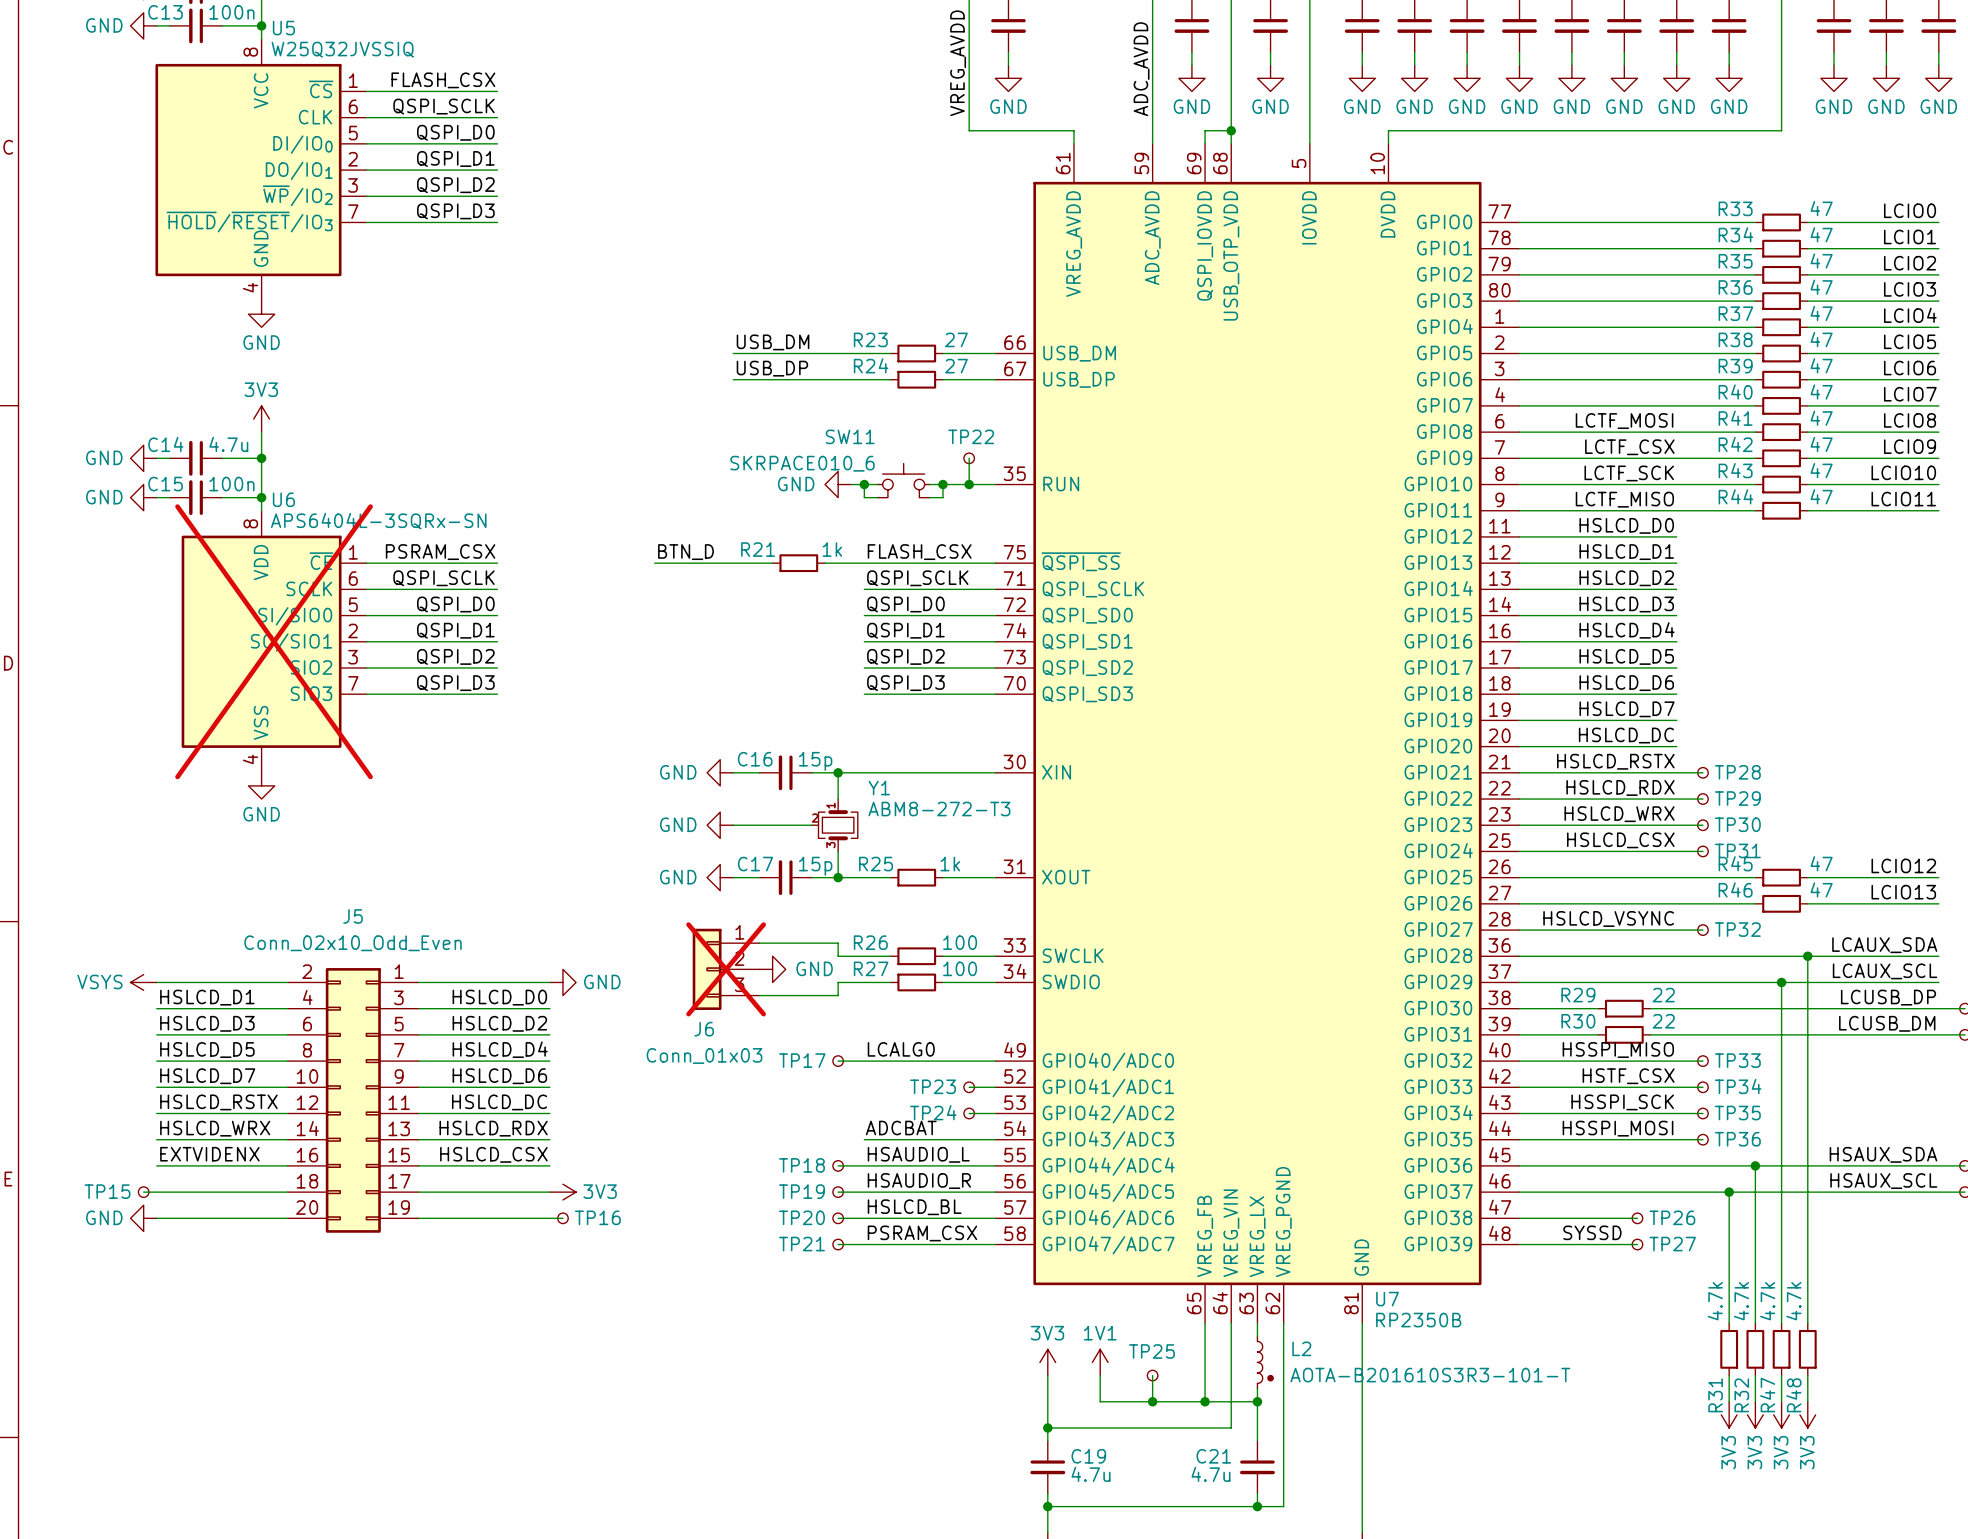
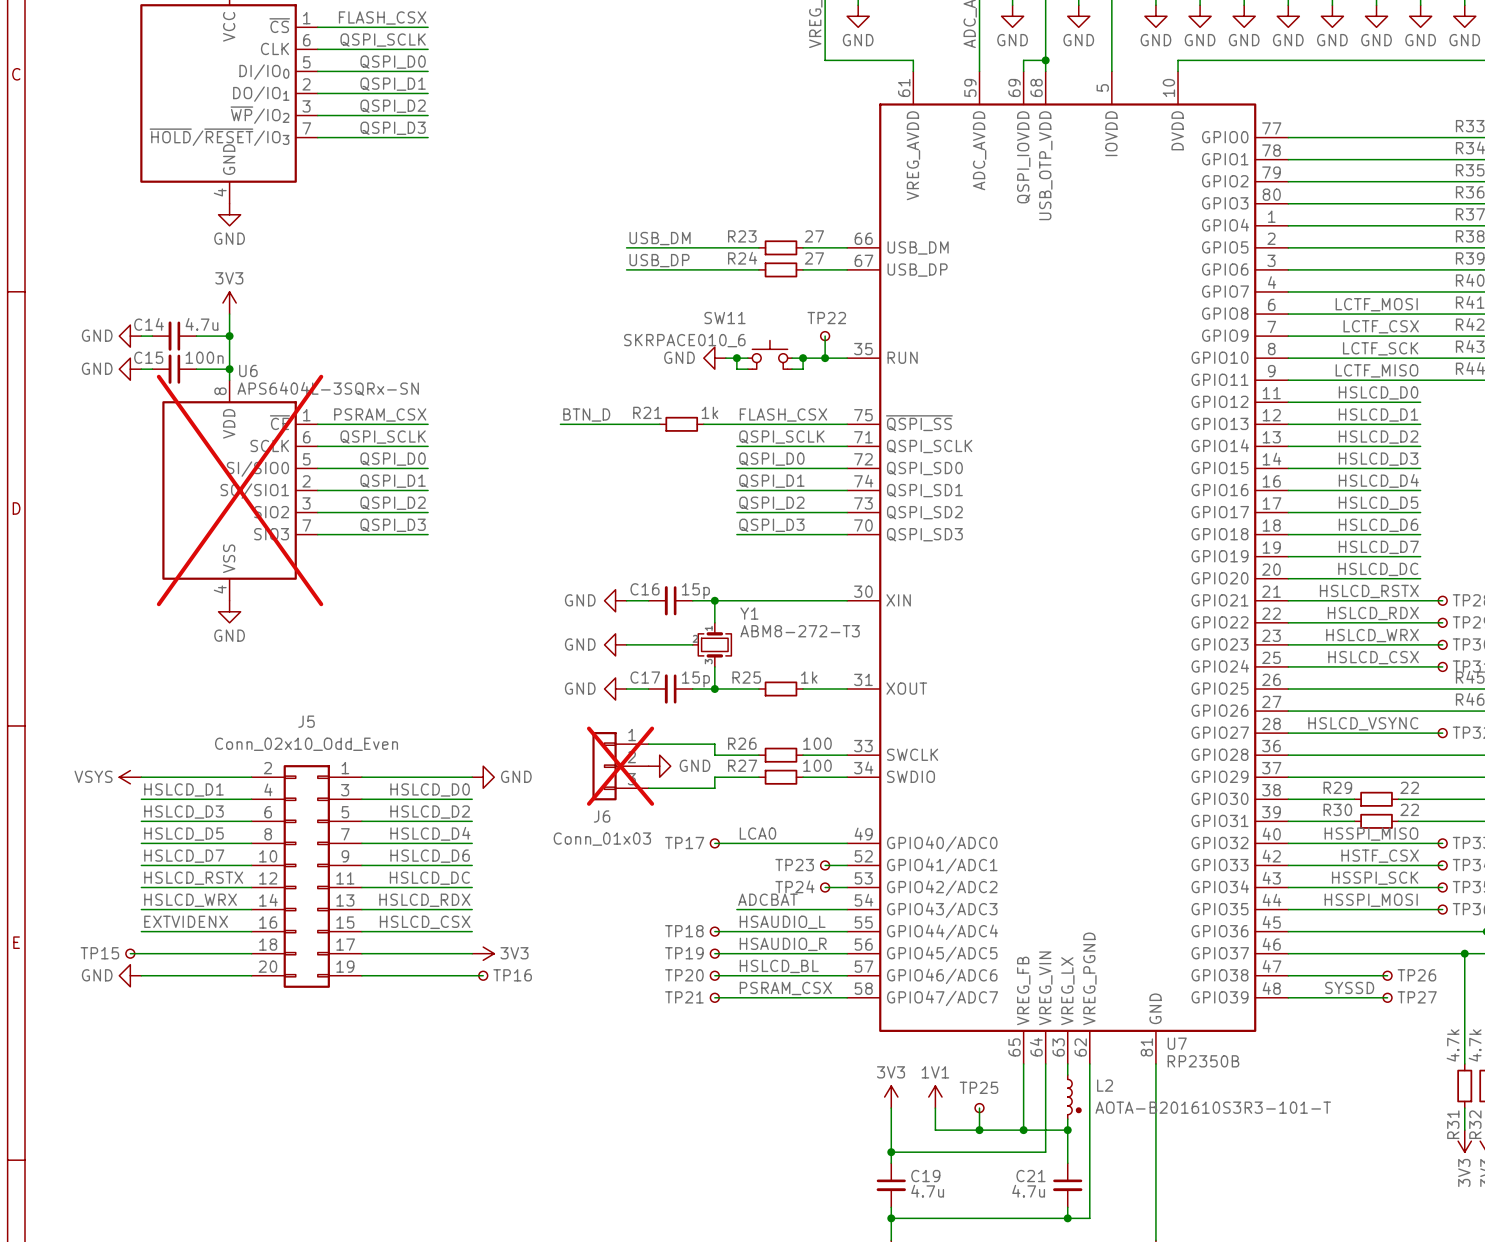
label: LCALG0 (901, 1049) -> LCA0 (757, 833)

